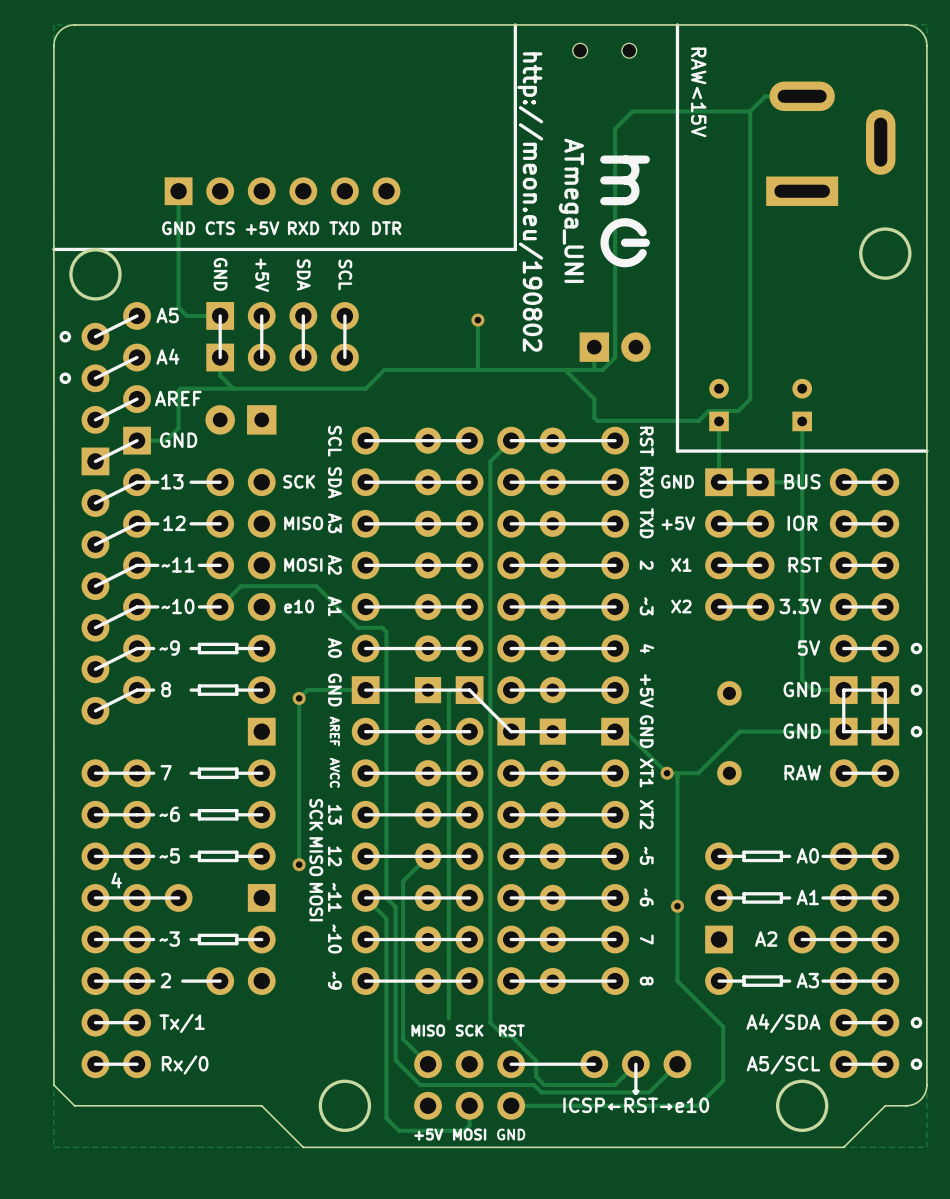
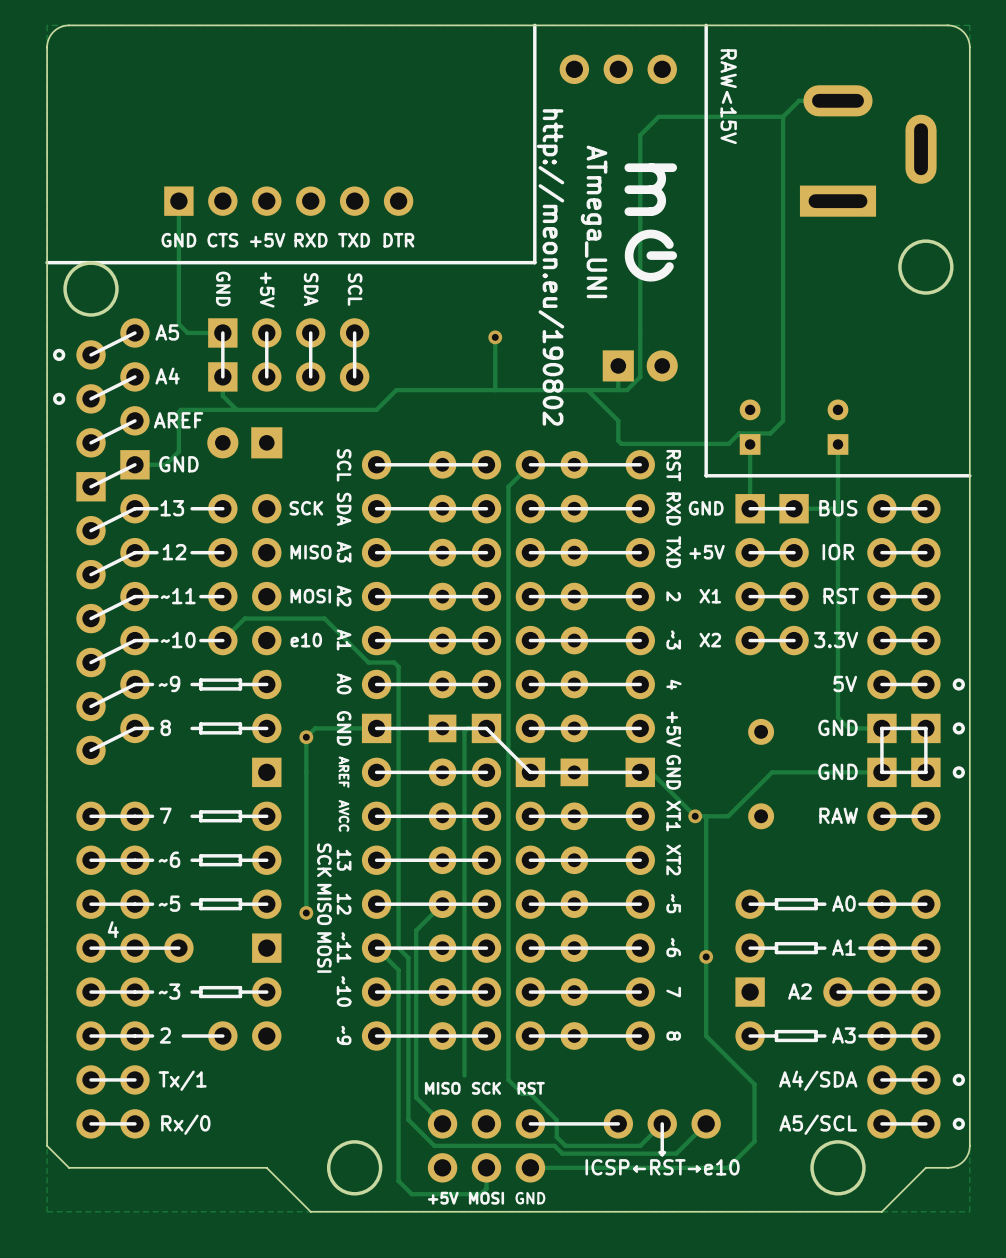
part: (604, 50) -> none
part: none -> (618, 69)
text position: http://meon.eu/190802 (530, 202) -> http://meon.eu/190802 (550, 267)

